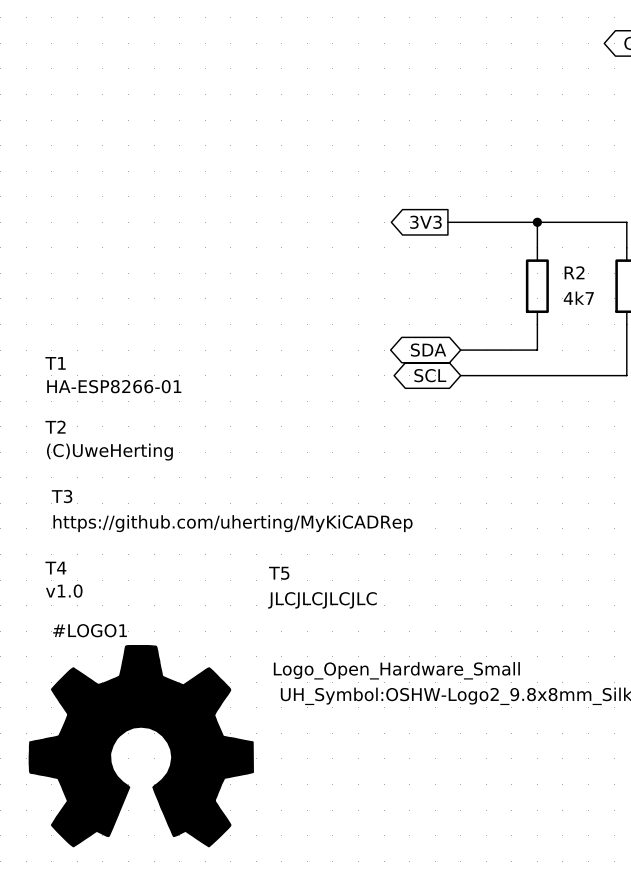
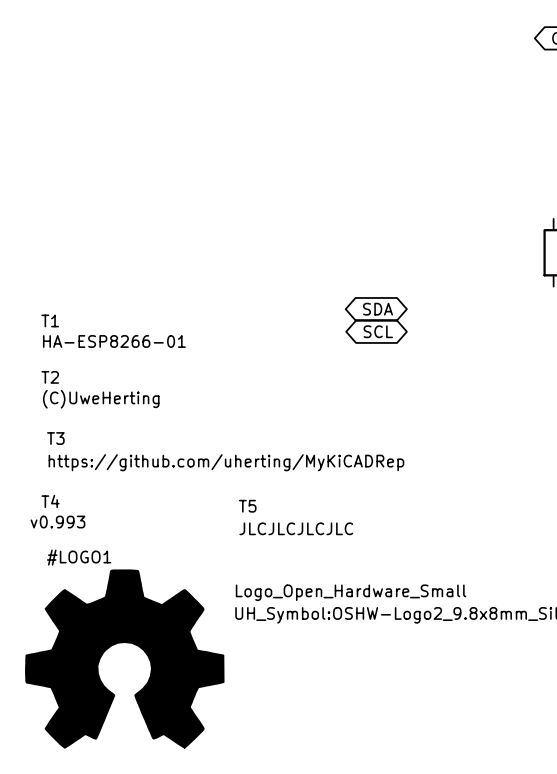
global label: 3V3 (425, 222) -> none
wire: (447, 222) (626, 222) (626, 247) -> none
wire: (537, 222) (537, 247) -> none
junction: (537, 222) -> none
R2: 4k7 (537, 286) -> none
wire: (537, 324) (537, 350) (460, 350) -> none
wire: (626, 324) (626, 375) (460, 375) -> none
T4 value: v1.0 (64, 591) -> v0.993 (57, 522)

